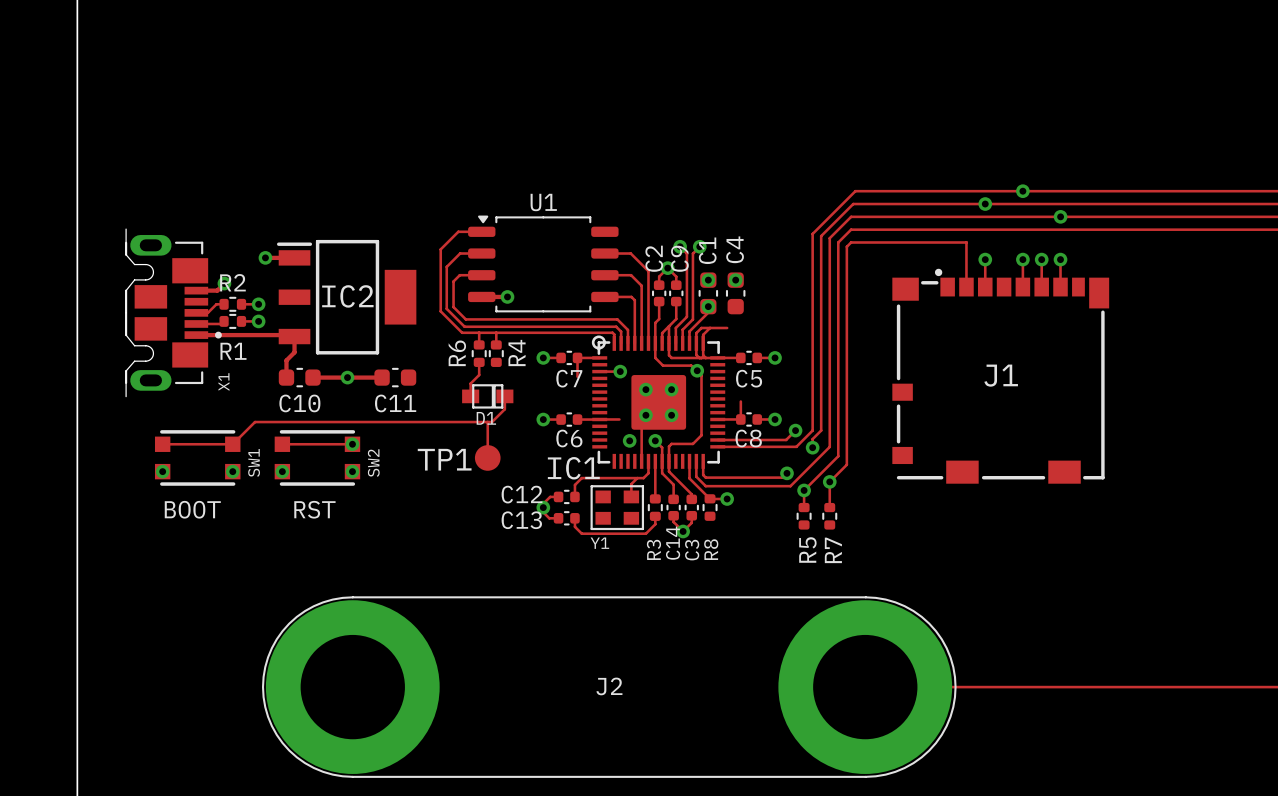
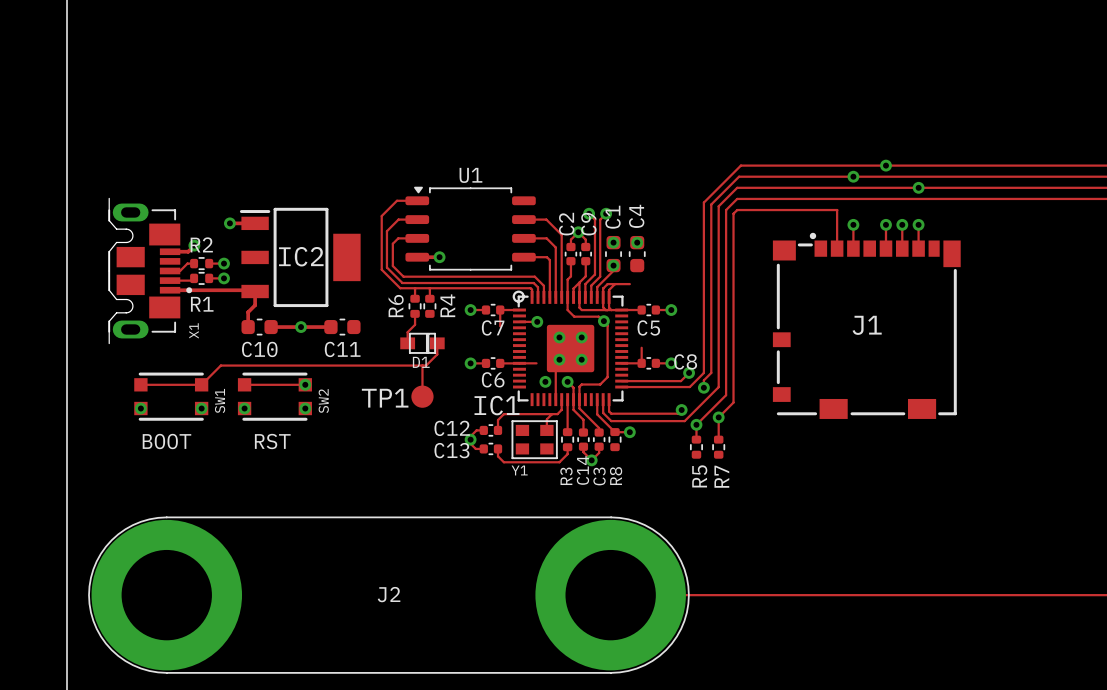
C8 name position: C8 (748, 438) -> C8 (685, 361)
J2 position: (609, 687) -> (388, 595)
track: none -> (610, 595) (749, 595)

